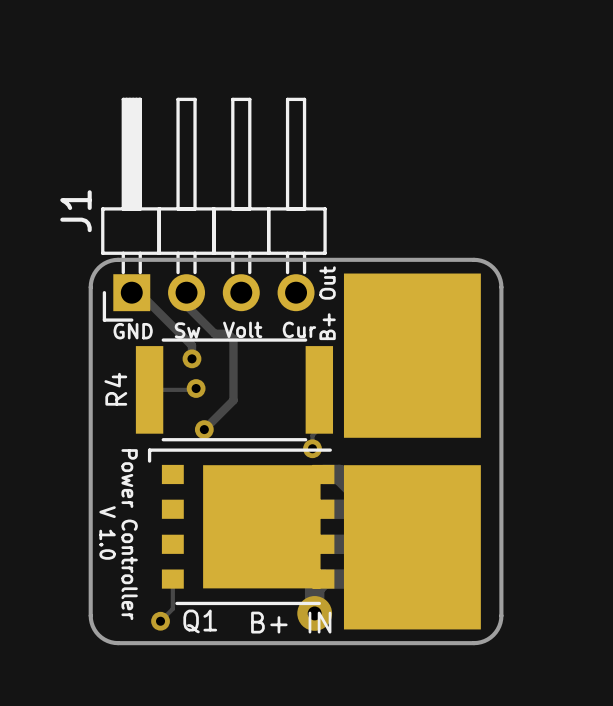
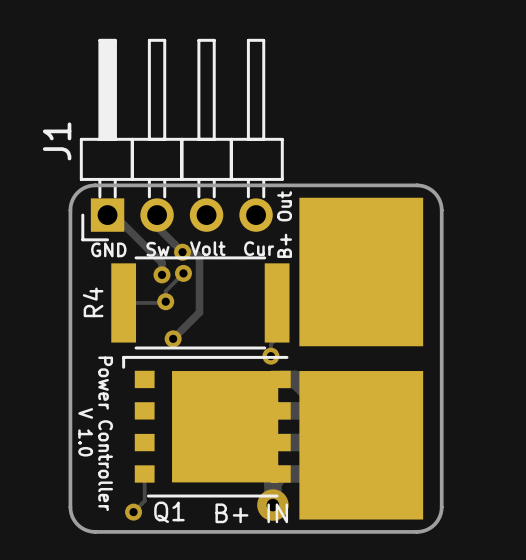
via: none -> (182, 252)
track: none -> (183, 273) (165, 291) (165, 301)
via: none -> (183, 273)

